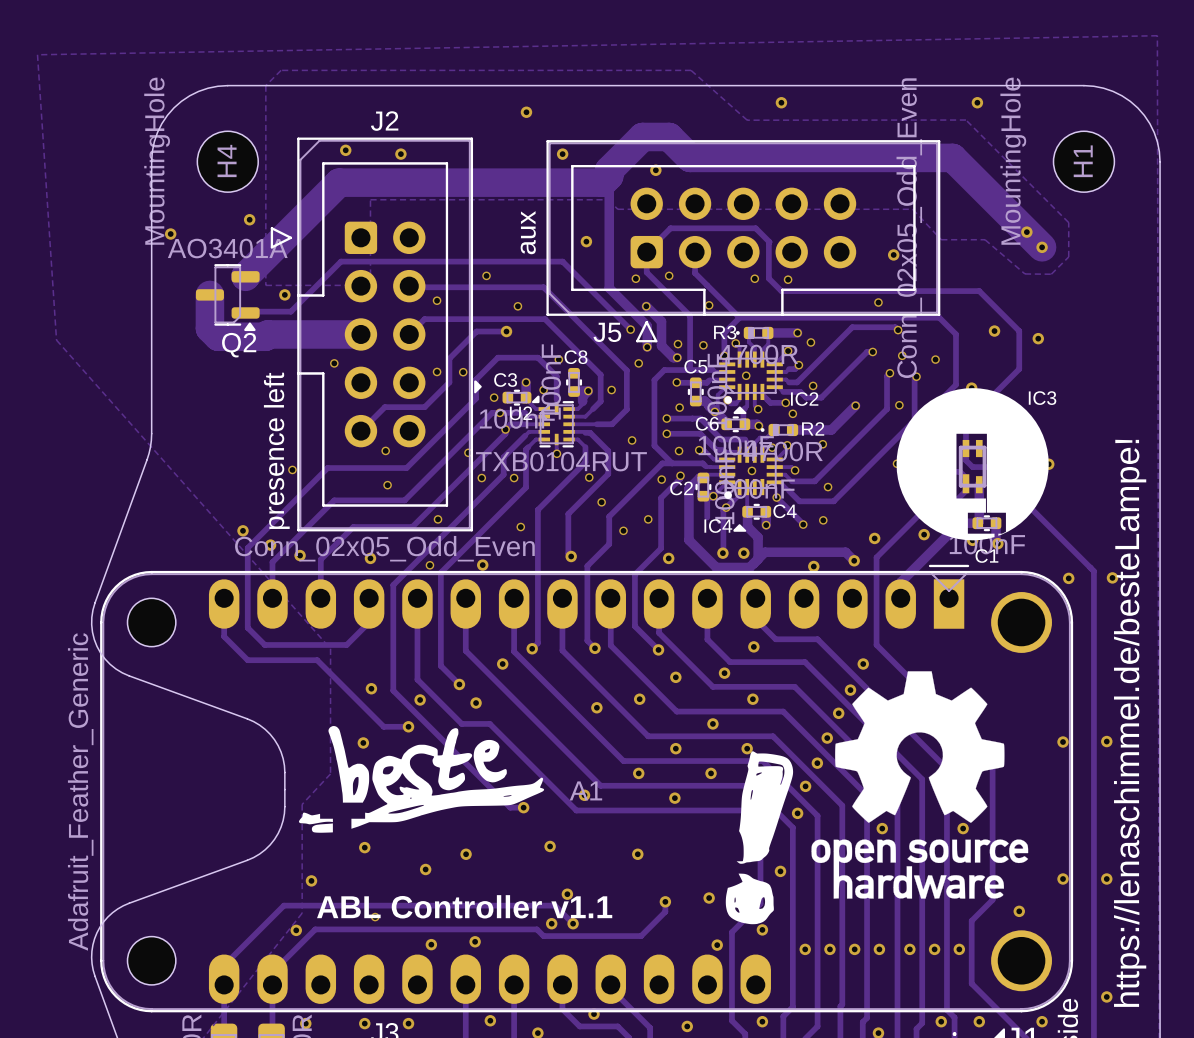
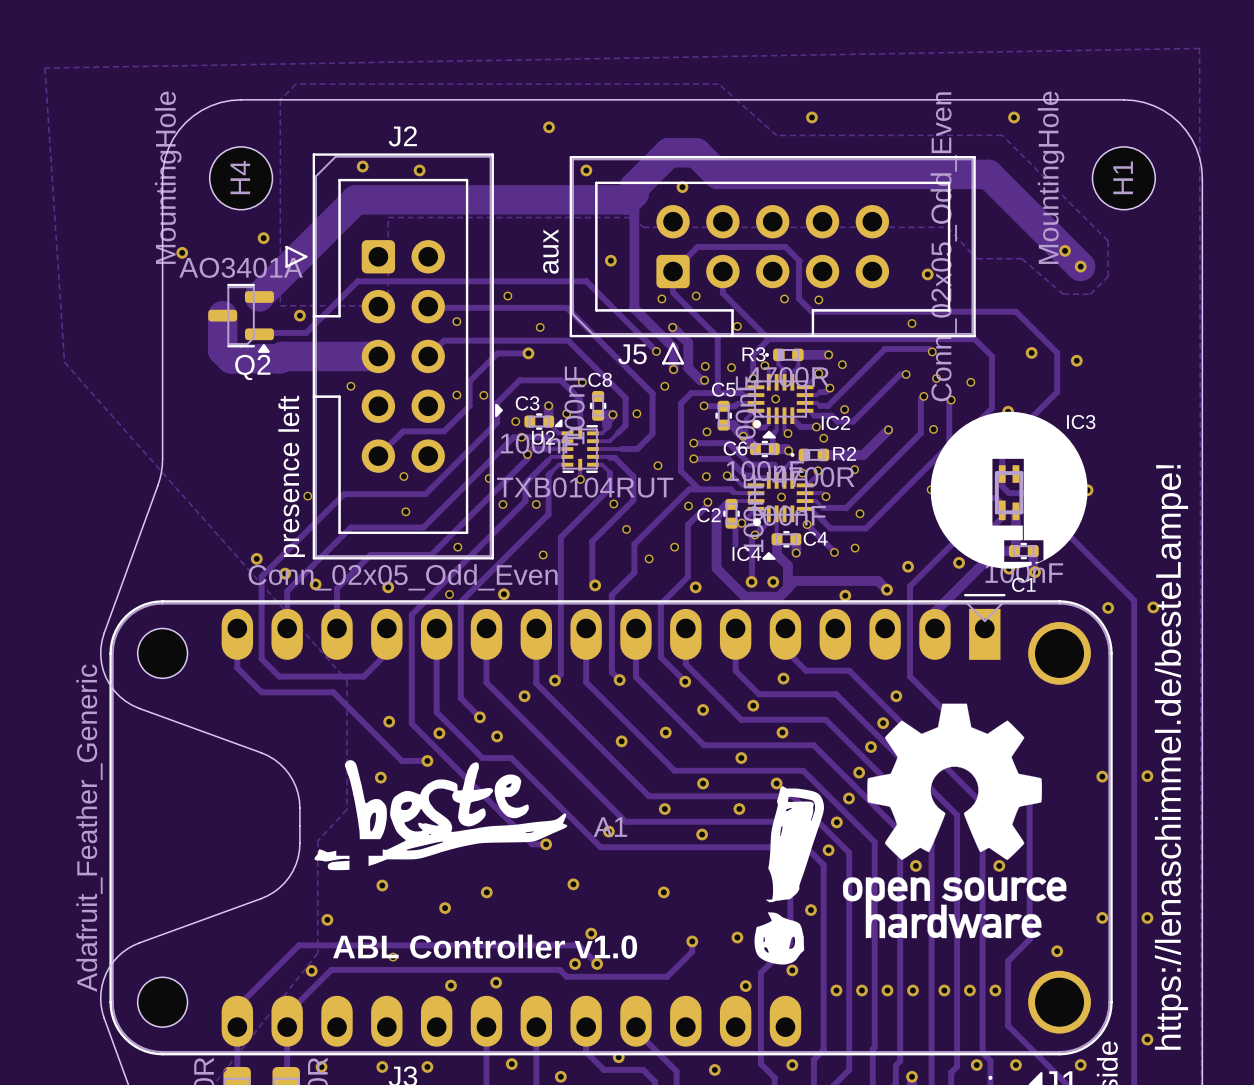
text: ABL Controller v1.1 (464, 906) -> ABL Controller v1.0 (485, 946)

